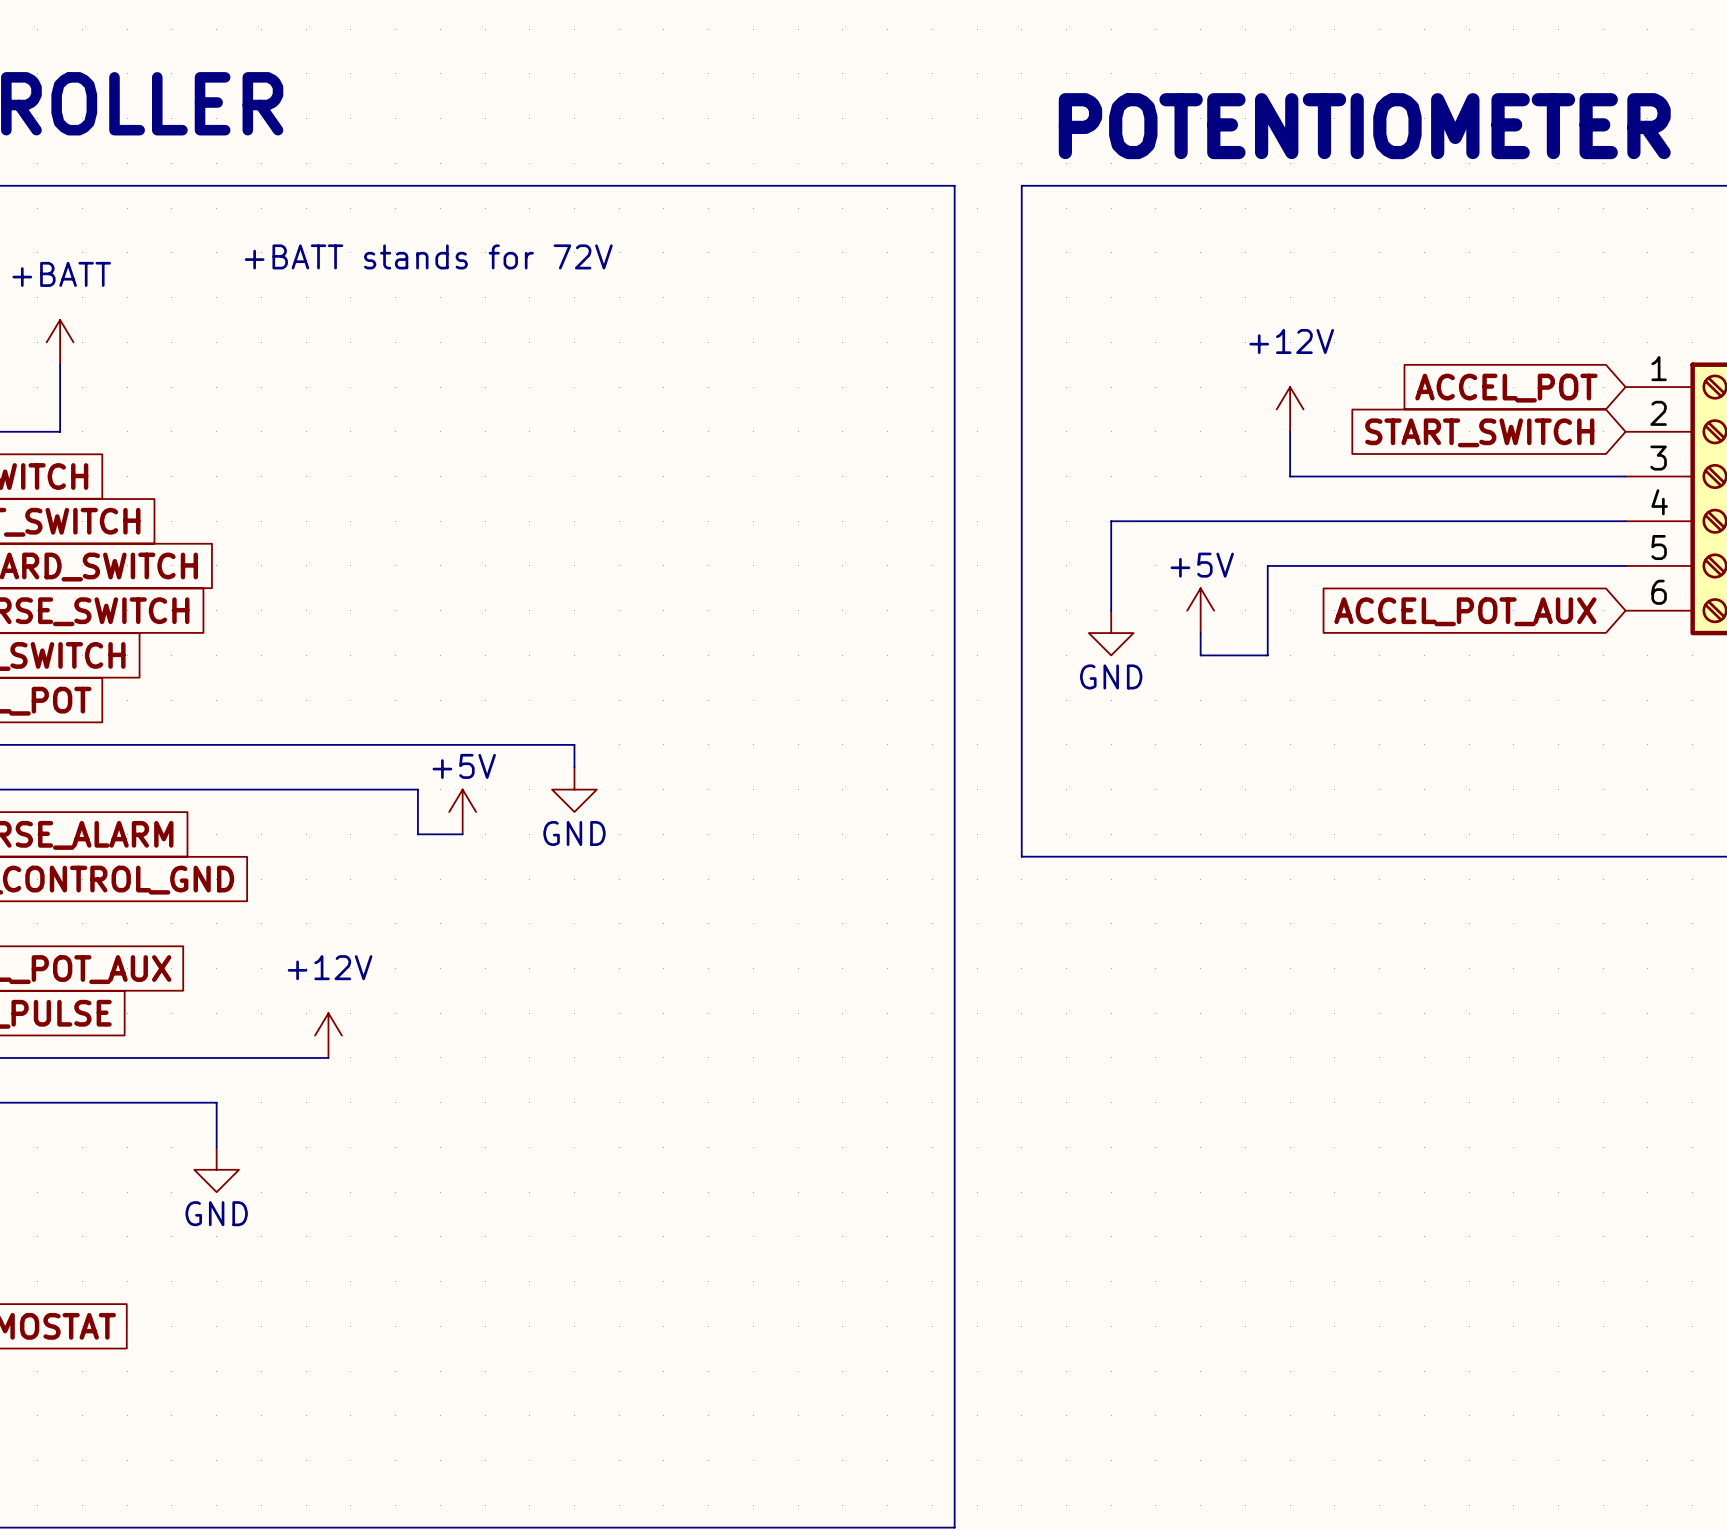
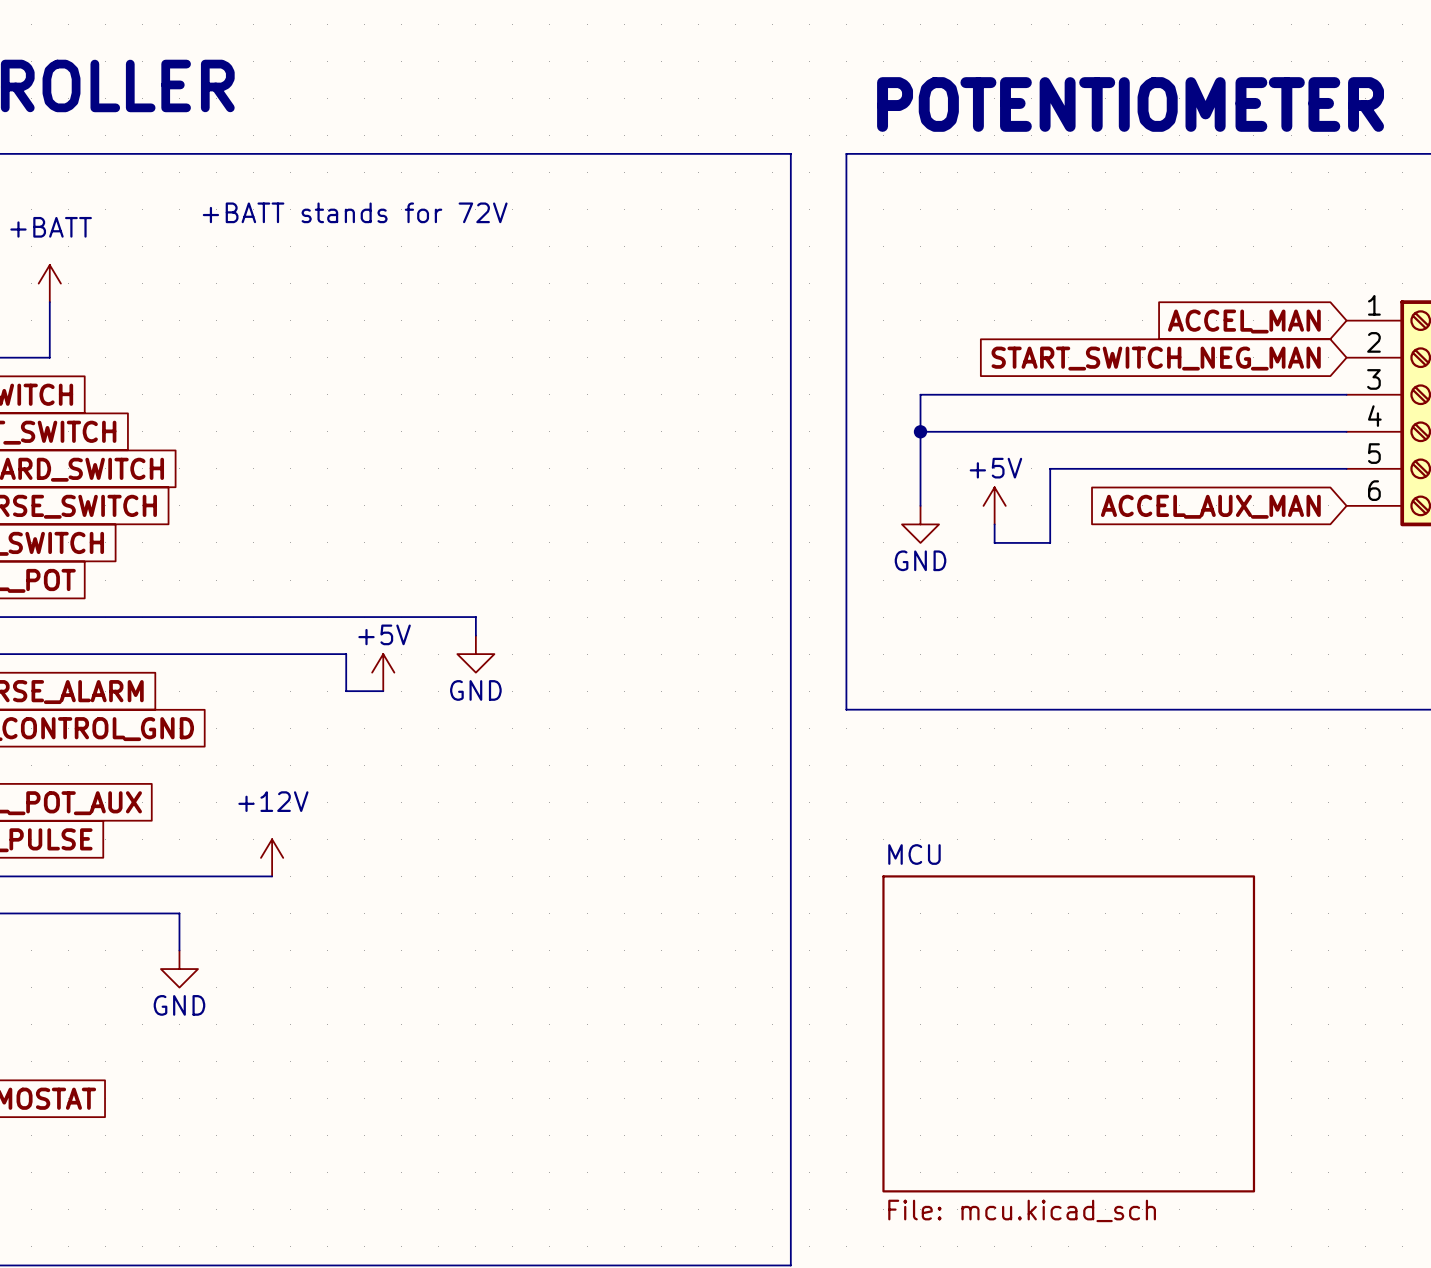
global label: ACCEL_POT (1506, 388) -> ACCEL_MAN (1244, 321)
power symbol: +12V (1290, 409) -> none
wire: (1290, 431) (1290, 476) -> (920, 431) (920, 394) (1068, 394)
global label: START_SWITCH (1479, 432) -> START_SWITCH_NEG_MAN (1156, 358)
junction: none -> (920, 431)
global label: ACCEL_POT_AUX (1465, 611) -> ACCEL_AUX_MAN (1210, 506)
sheet MCU: none -> File: mcu.kicad_sch (1068, 1033)

